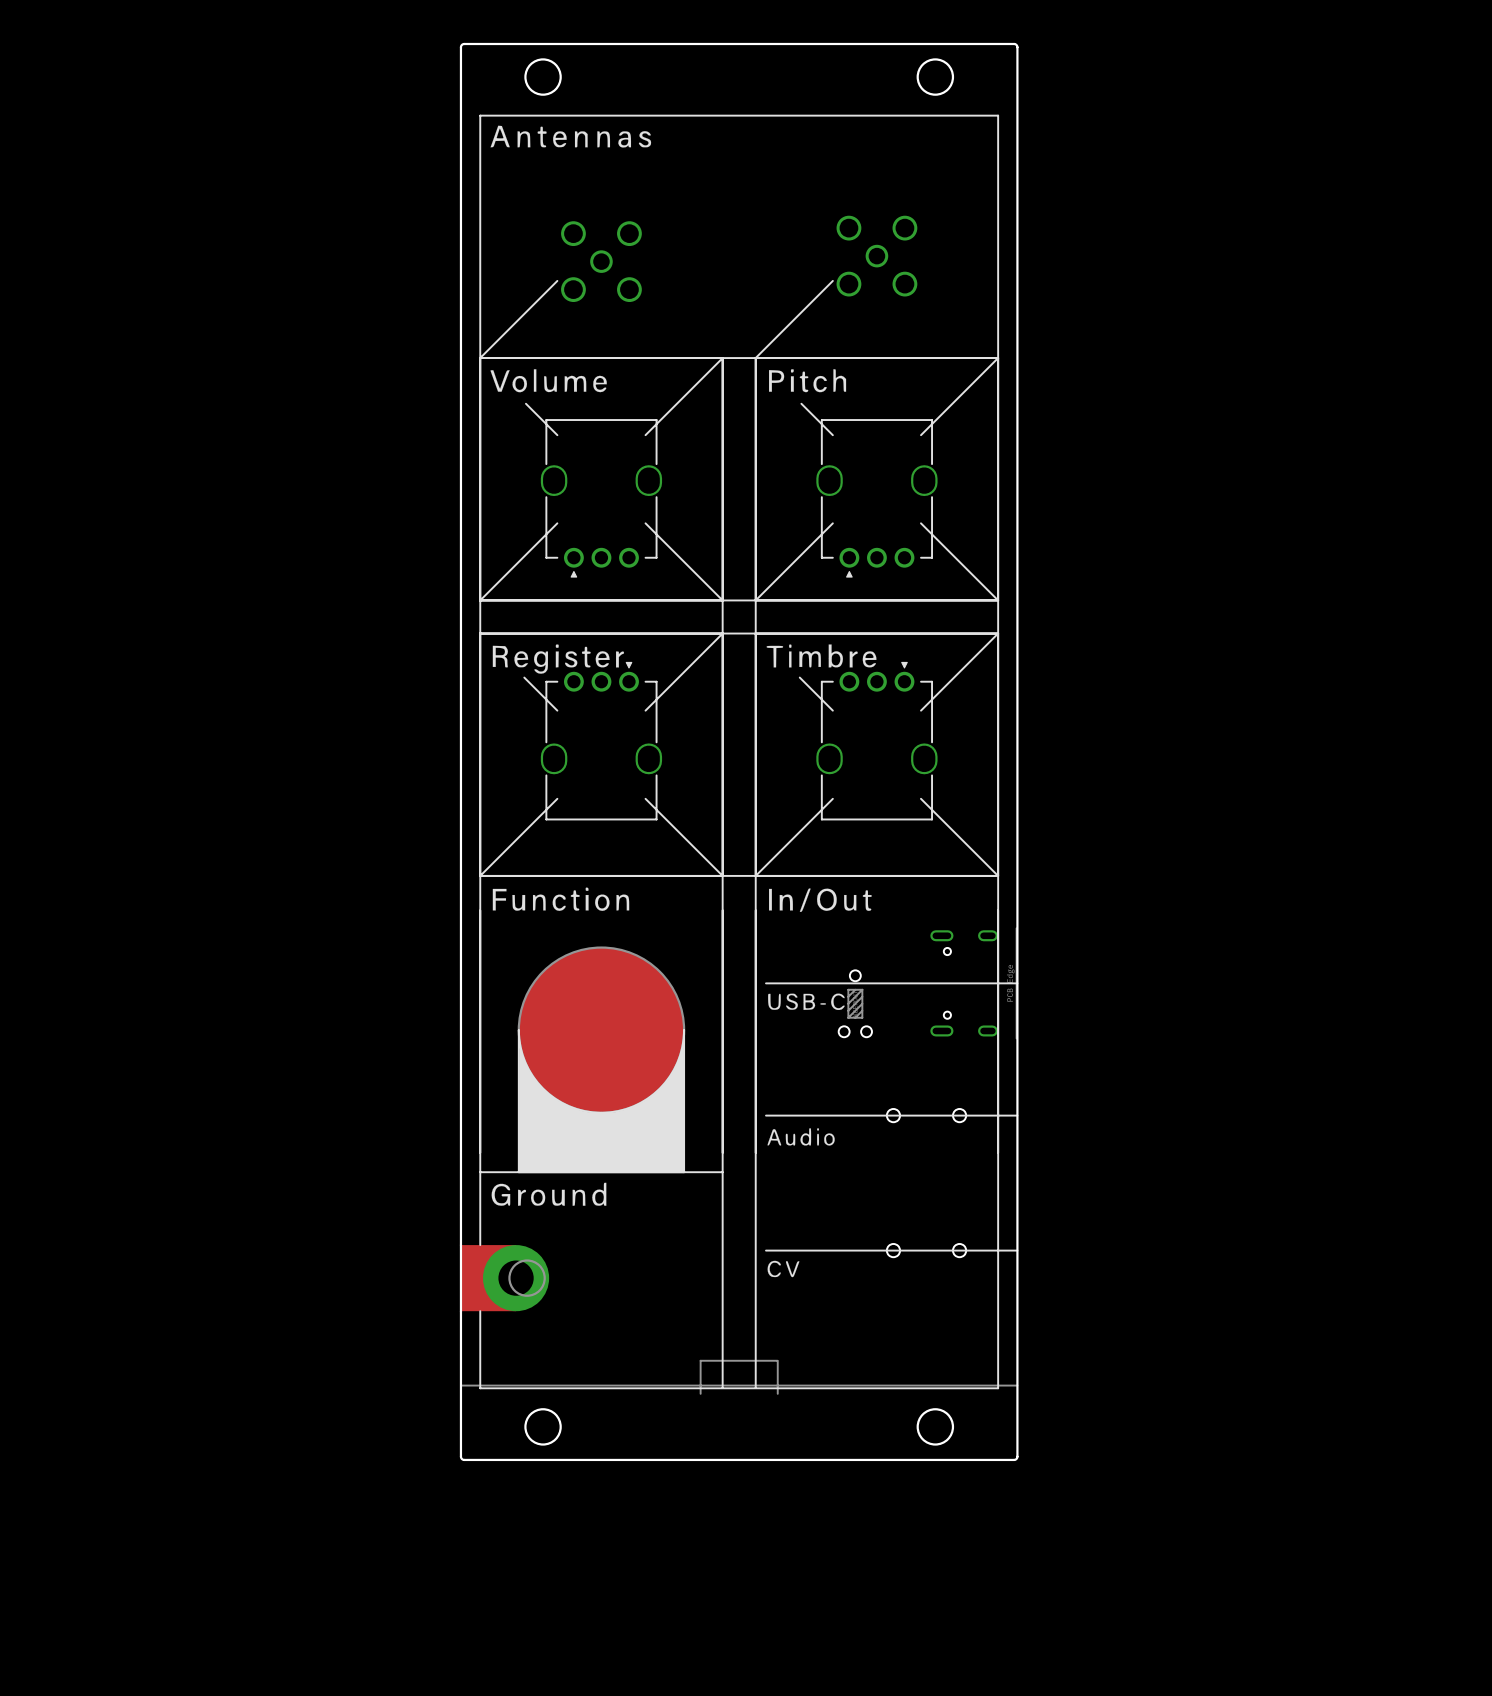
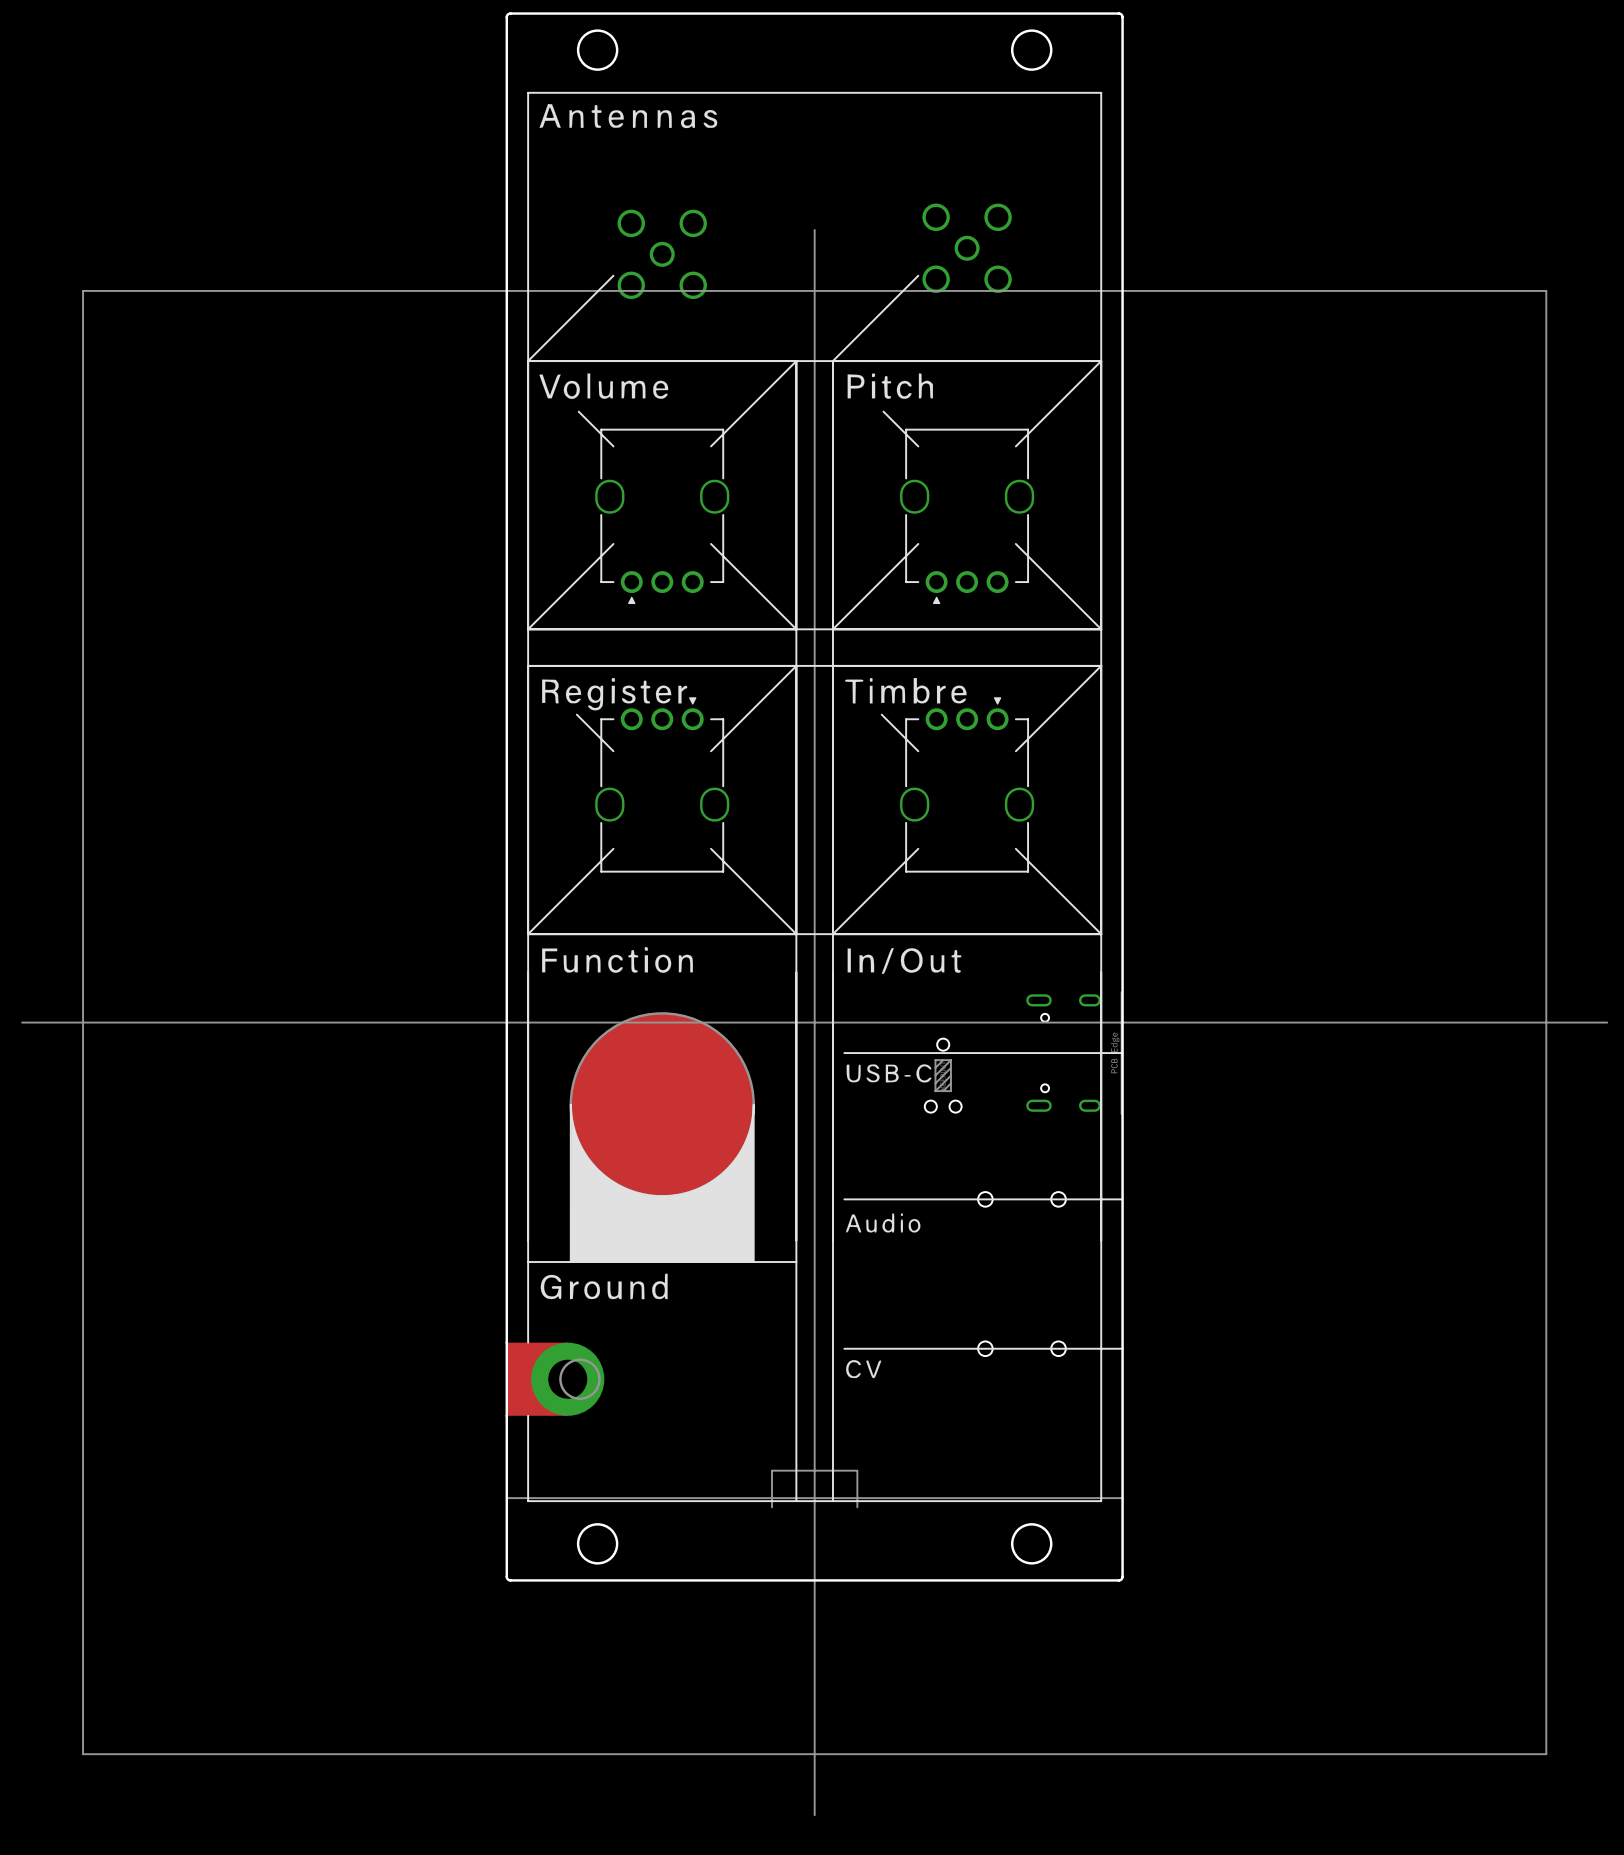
line: none -> (814, 229) (814, 1815)
line: none -> (83, 290) (1546, 290) (1546, 1754) (83, 1754) (83, 290)
line: none -> (22, 1022) (1607, 1022)

